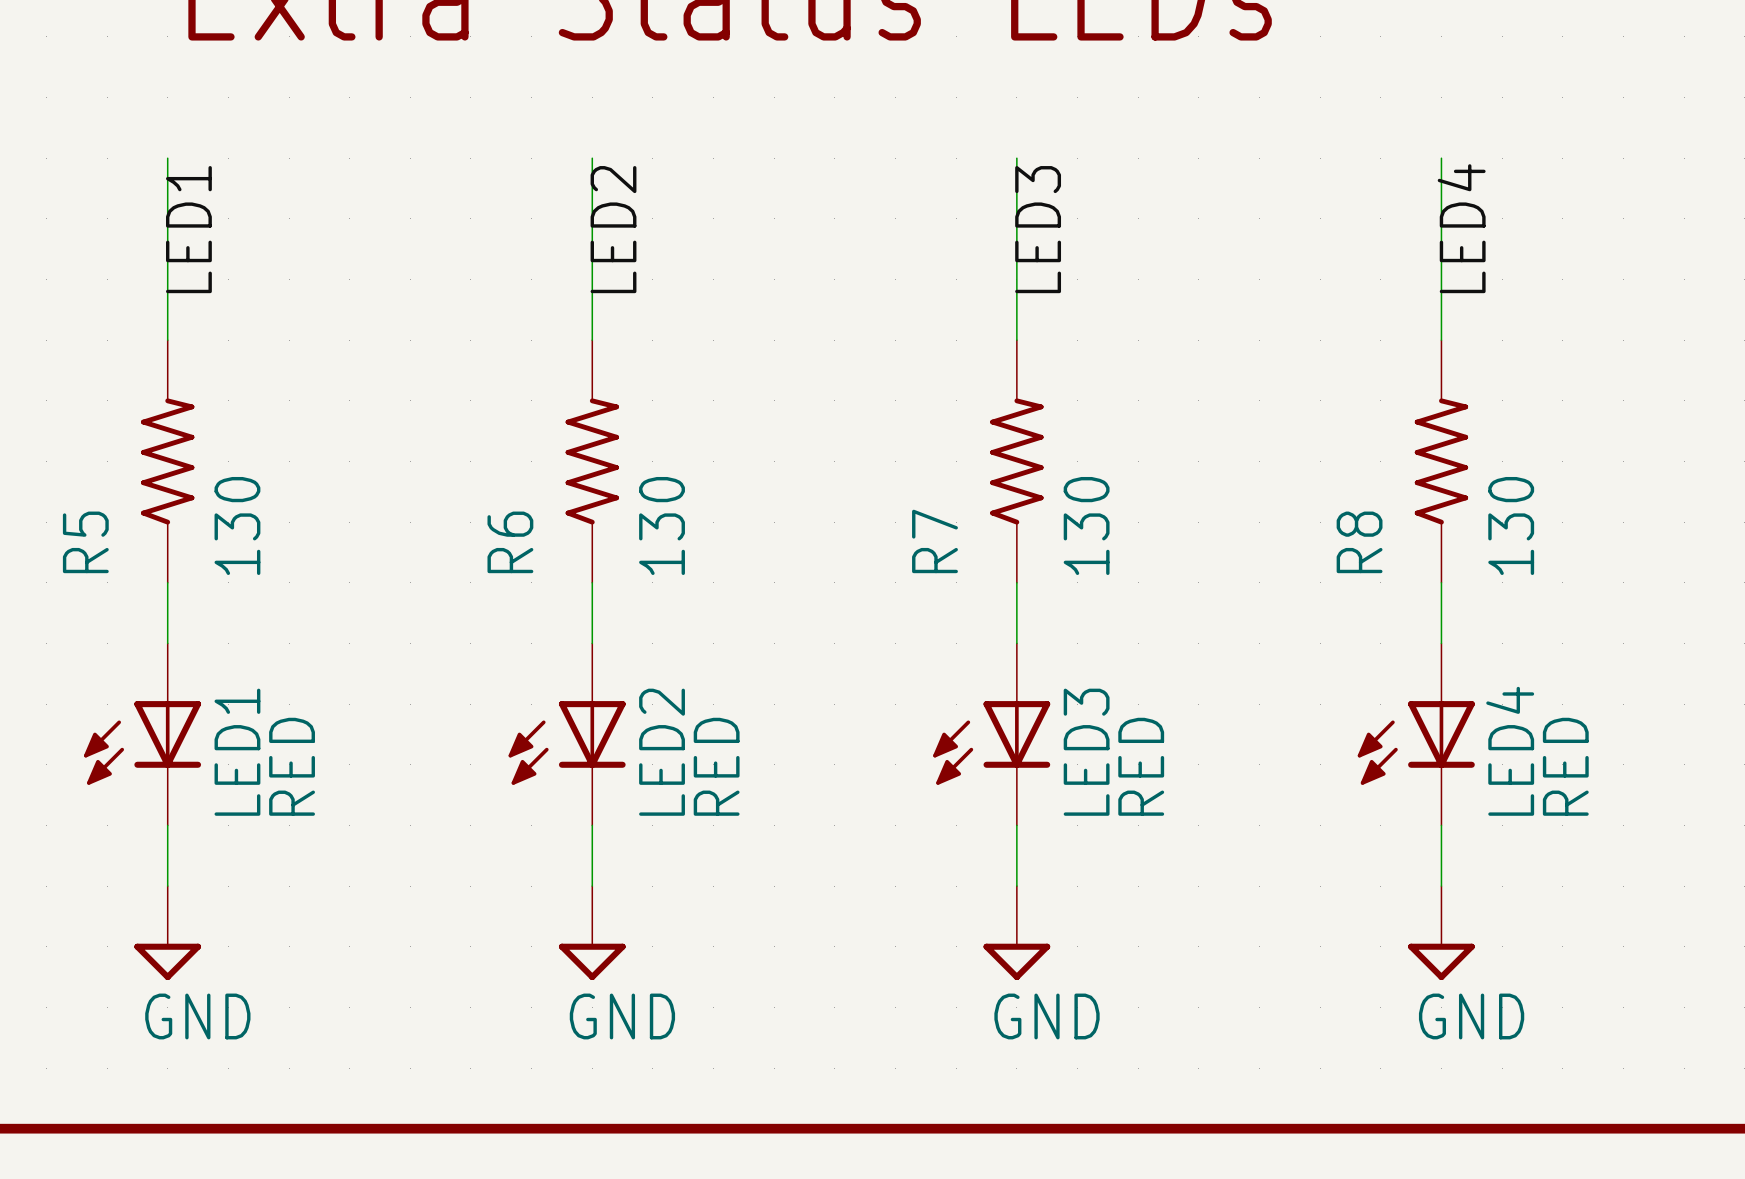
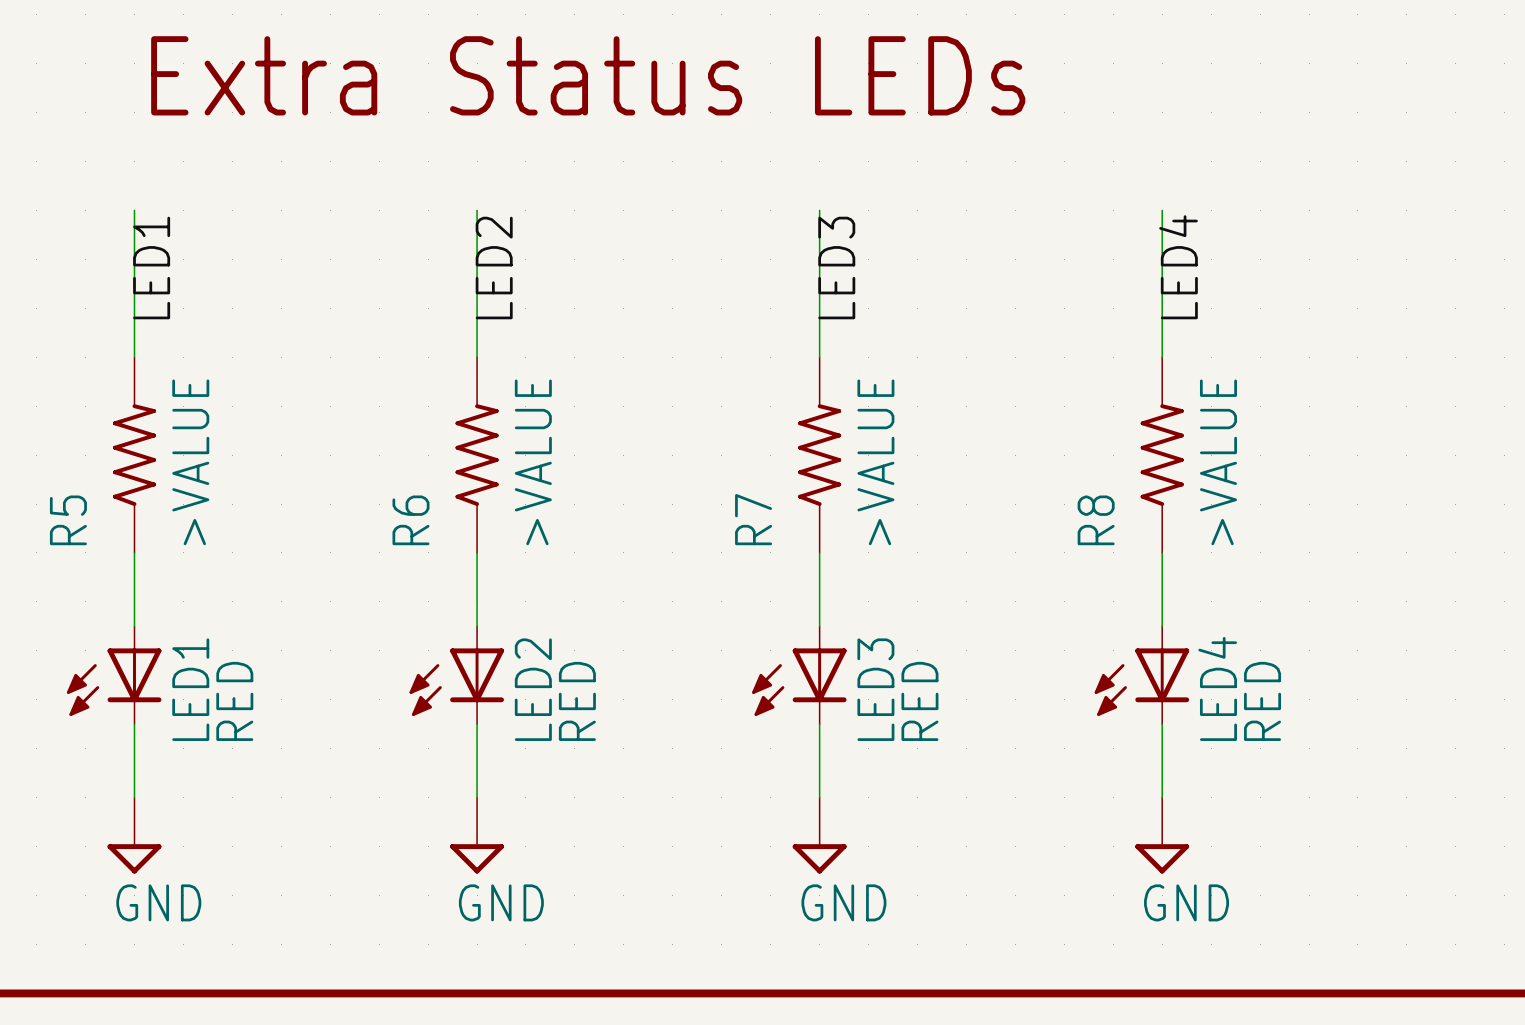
R5 value: 130 (237, 525) -> >VALUE (190, 462)
R6 value: 130 (662, 525) -> >VALUE (533, 462)
R7 value: 130 (1086, 525) -> >VALUE (875, 462)
R8 value: 130 (1511, 525) -> >VALUE (1218, 462)
LED1 symbol: [84, 643, 202, 826] -> [66, 626, 162, 725]
LED2 symbol: [508, 643, 626, 826] -> [409, 626, 504, 725]
LED3 symbol: [933, 643, 1051, 826] -> [752, 626, 847, 725]
LED4 symbol: [1357, 643, 1475, 826] -> [1094, 626, 1190, 725]

